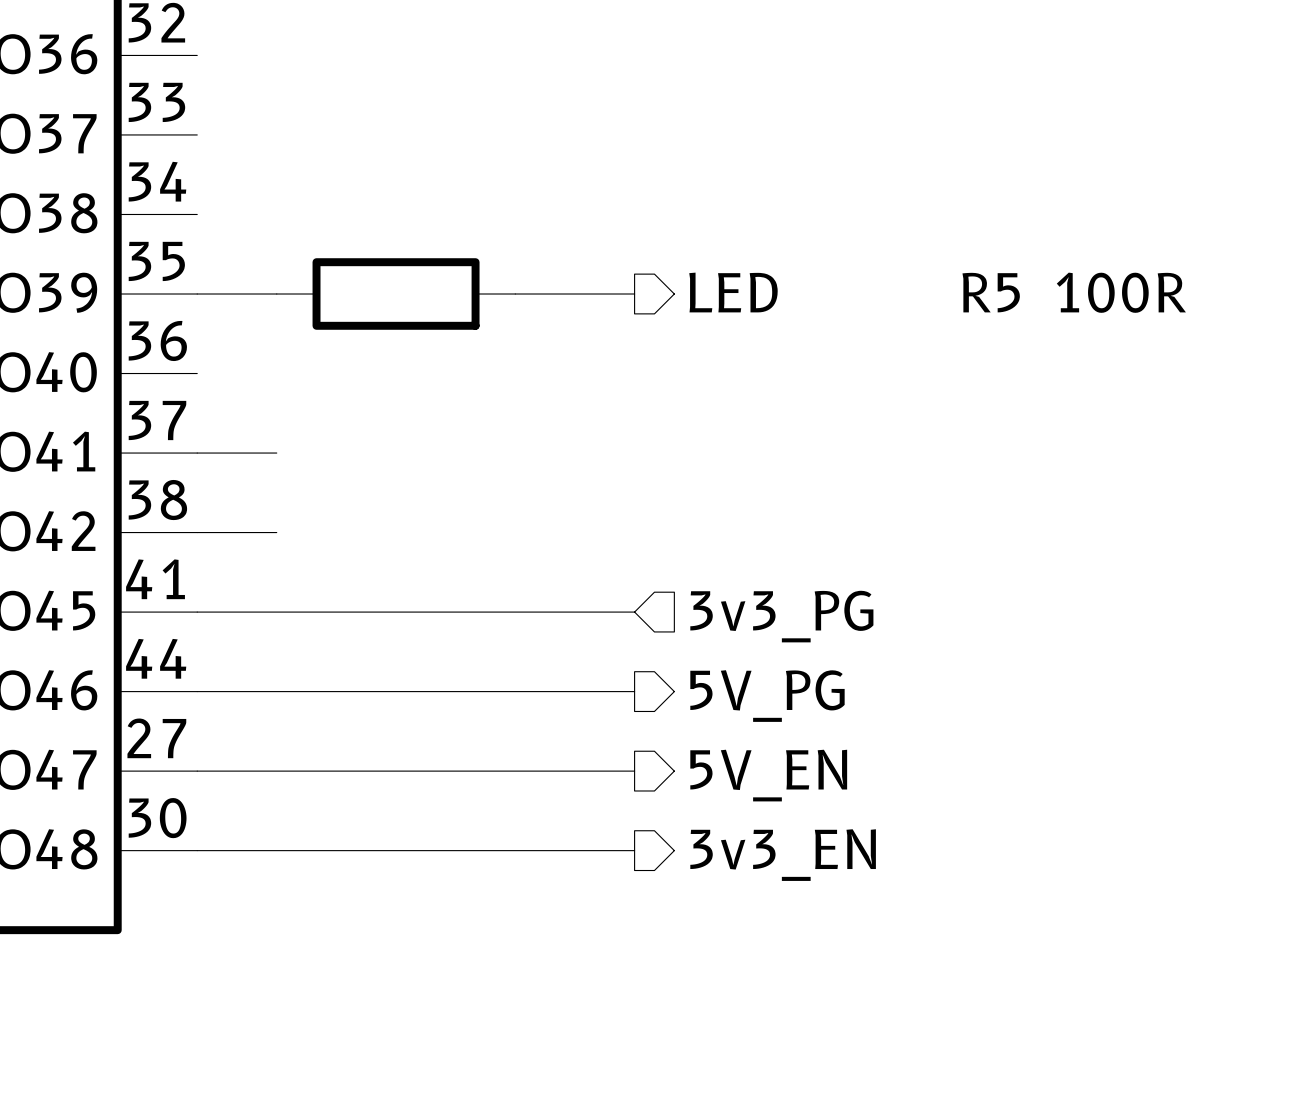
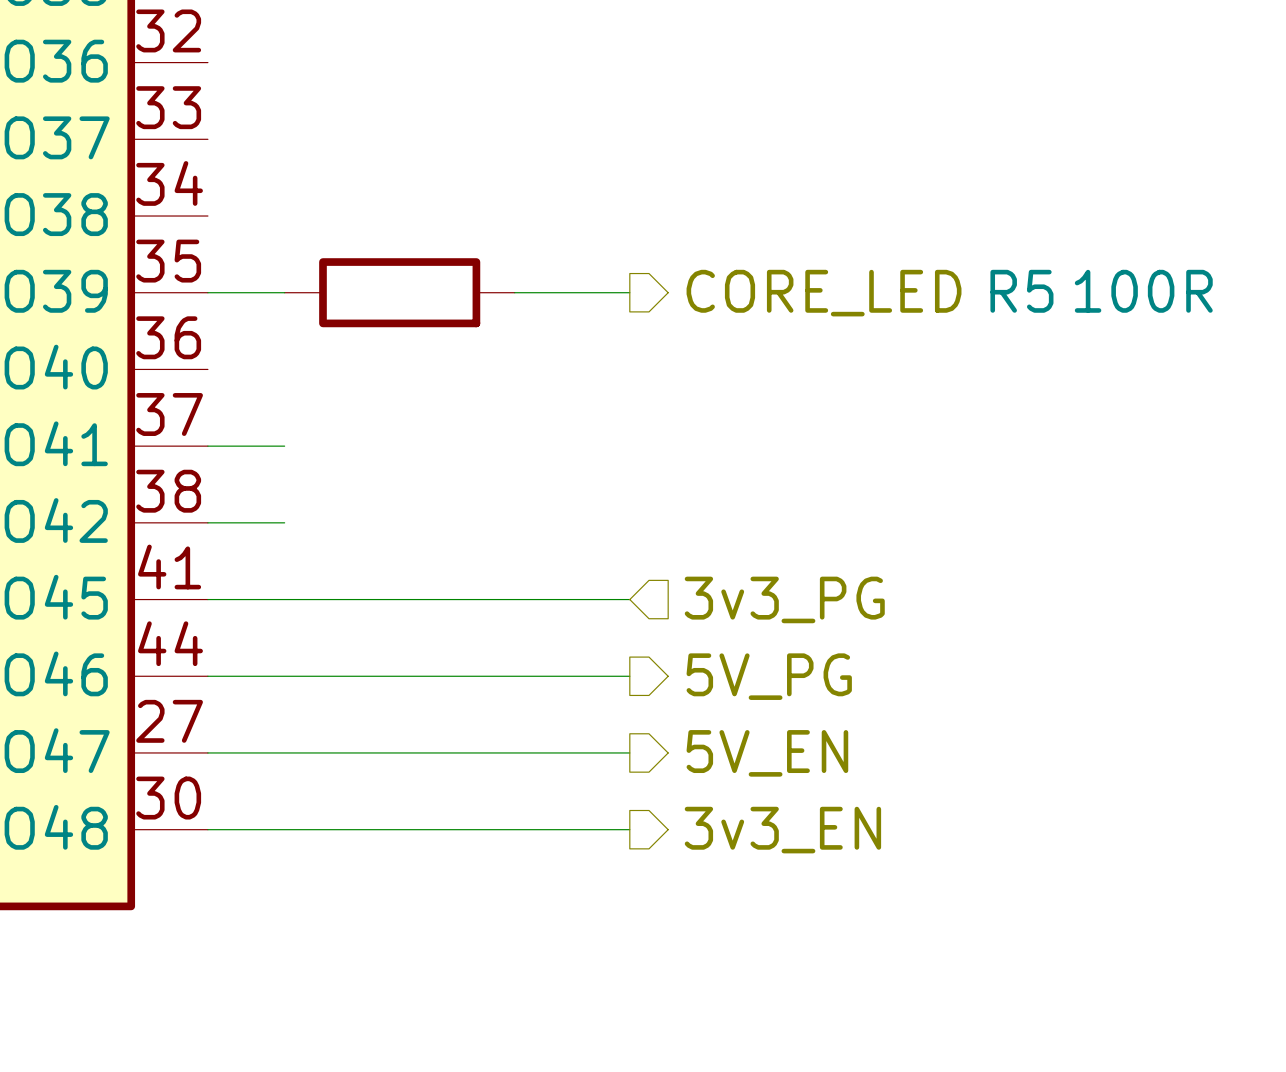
hierarchical label: LED (733, 292) -> CORE_LED (824, 293)
R5 name position: R5 (991, 292) -> R5 (1021, 291)
R5 value position: 100R (1121, 292) -> 100R (1143, 291)

